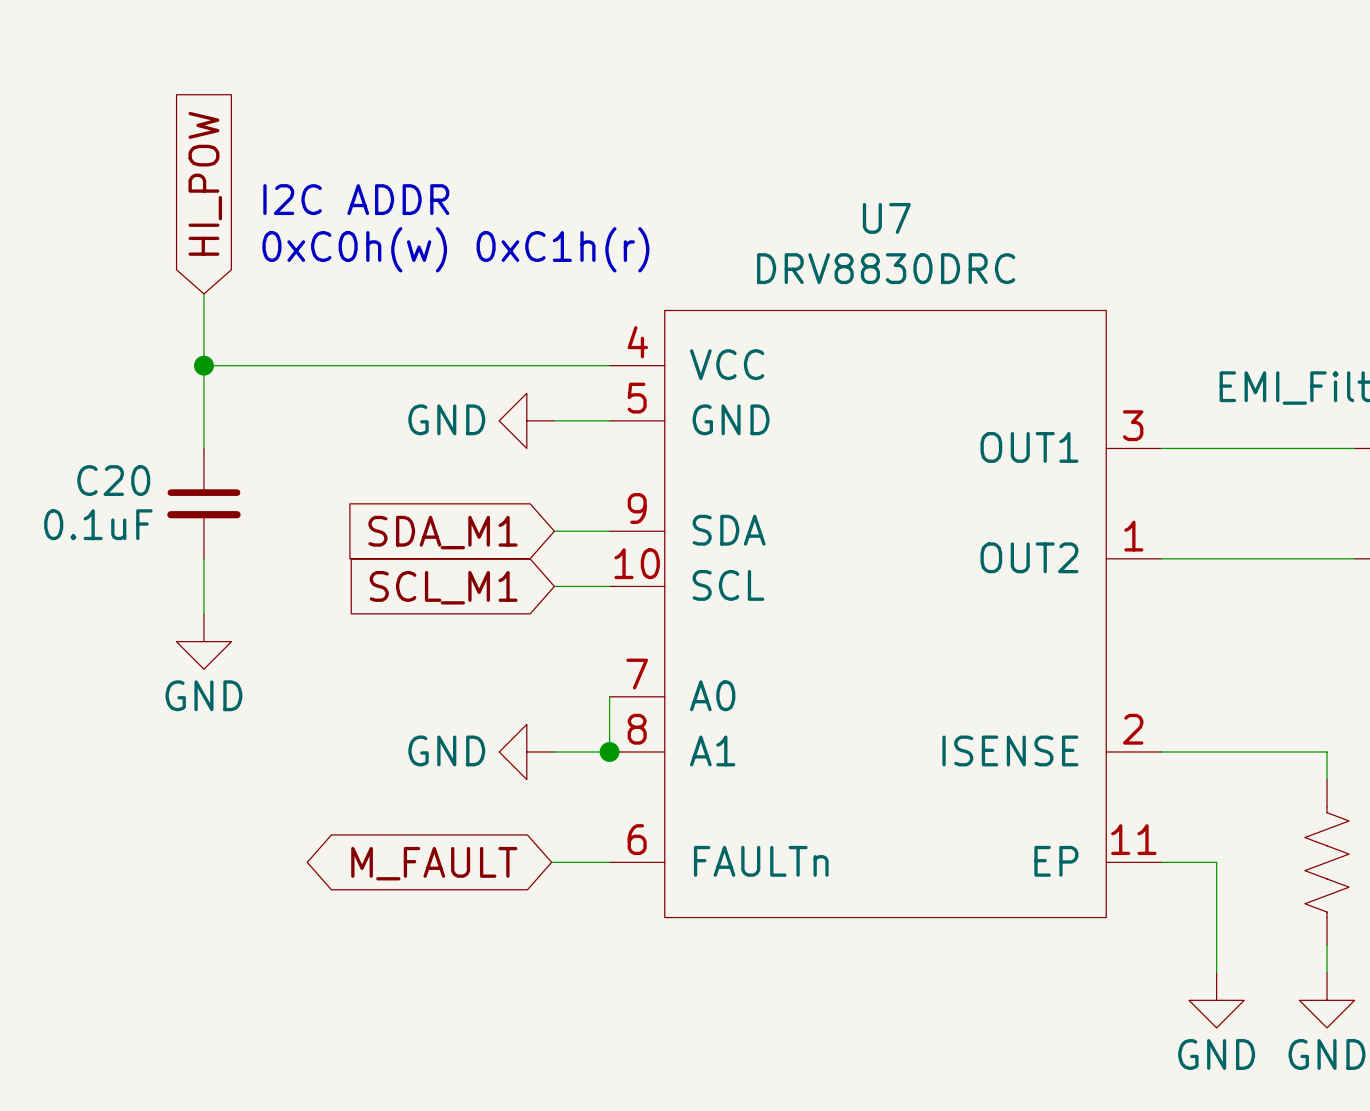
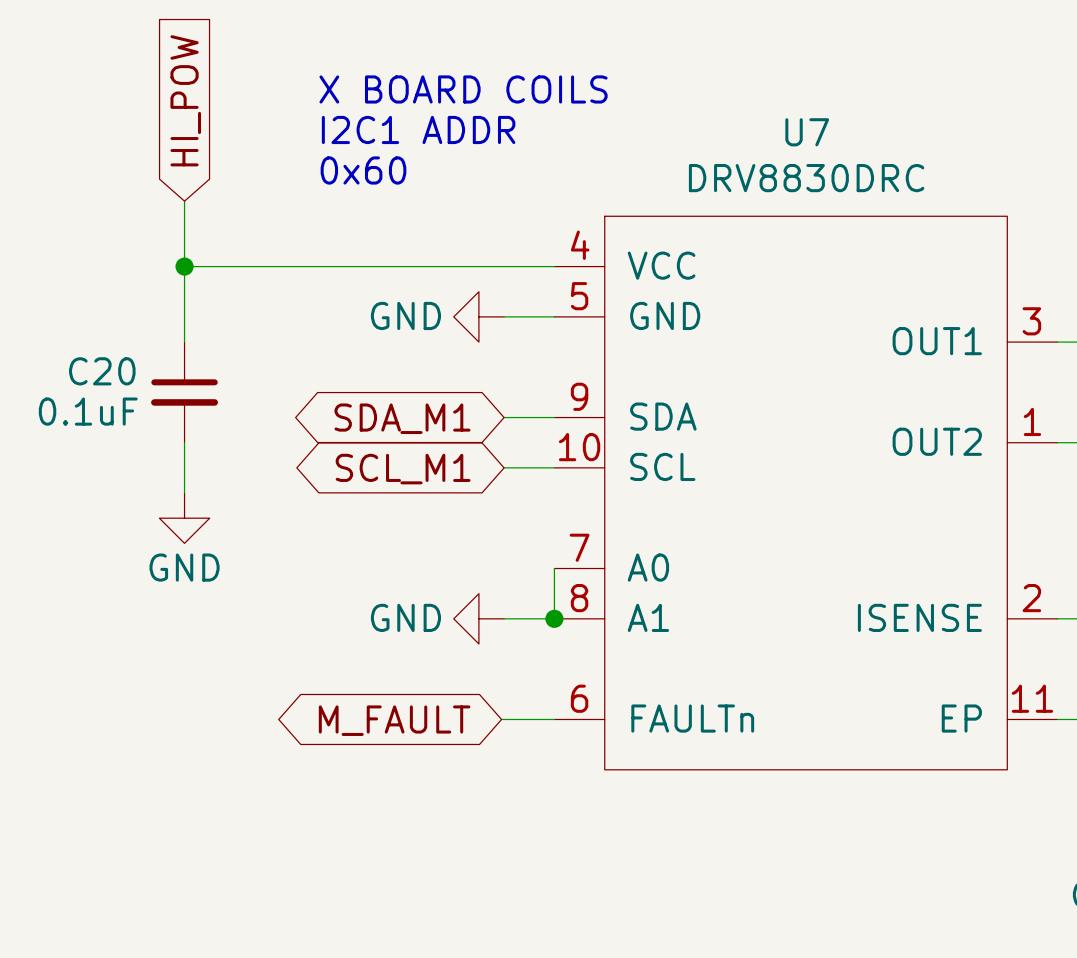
text: none -> X BOARD COILS (463, 89)
text: I2C ADDR (356, 199) -> I2C1 ADDR (418, 129)
text: 0xC0h(w) 0xC1h(r) (455, 249) -> none
text: none -> 0x60 (363, 170)
global label shape: input (442, 532) -> bidirectional (402, 418)
global label shape: input (443, 587) -> bidirectional (403, 469)

